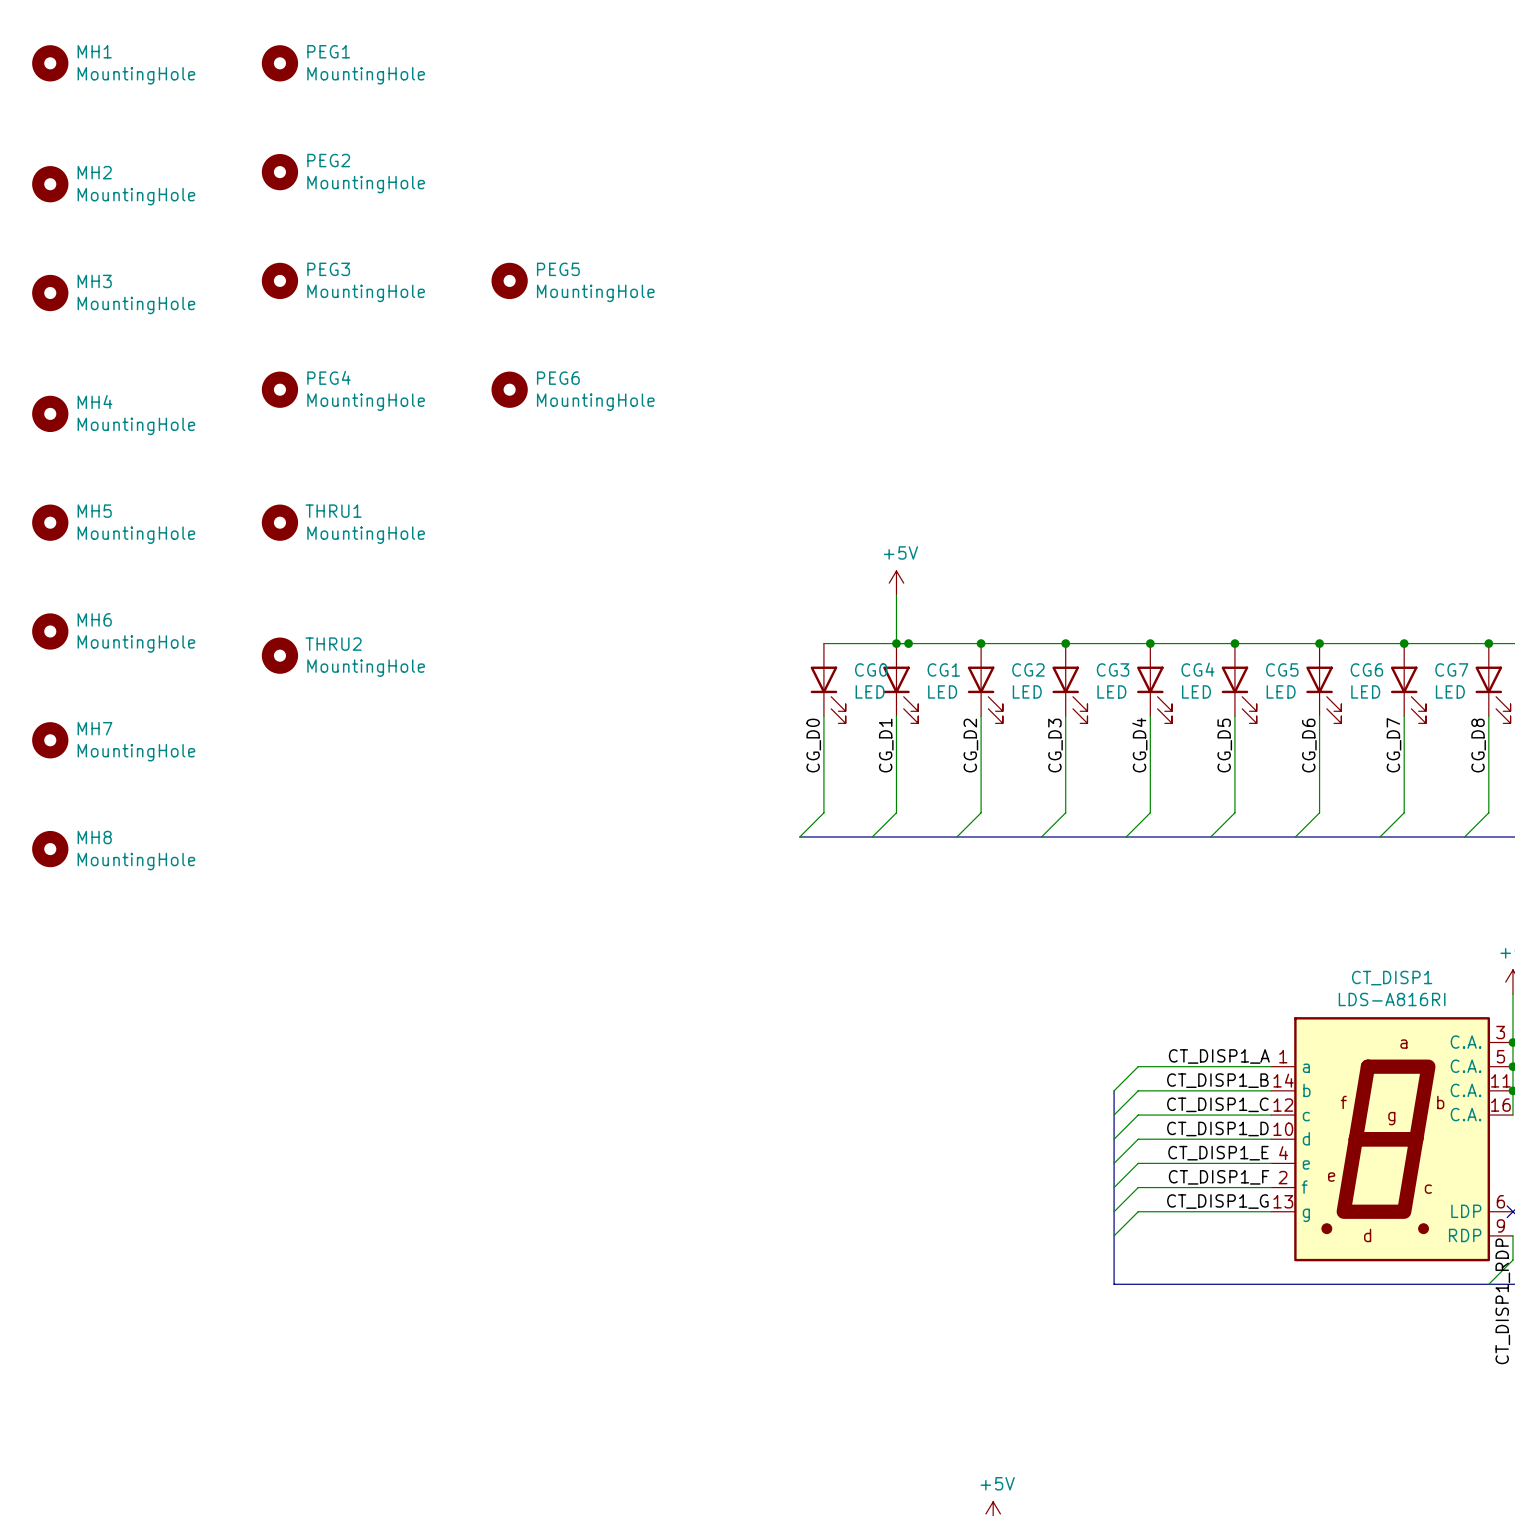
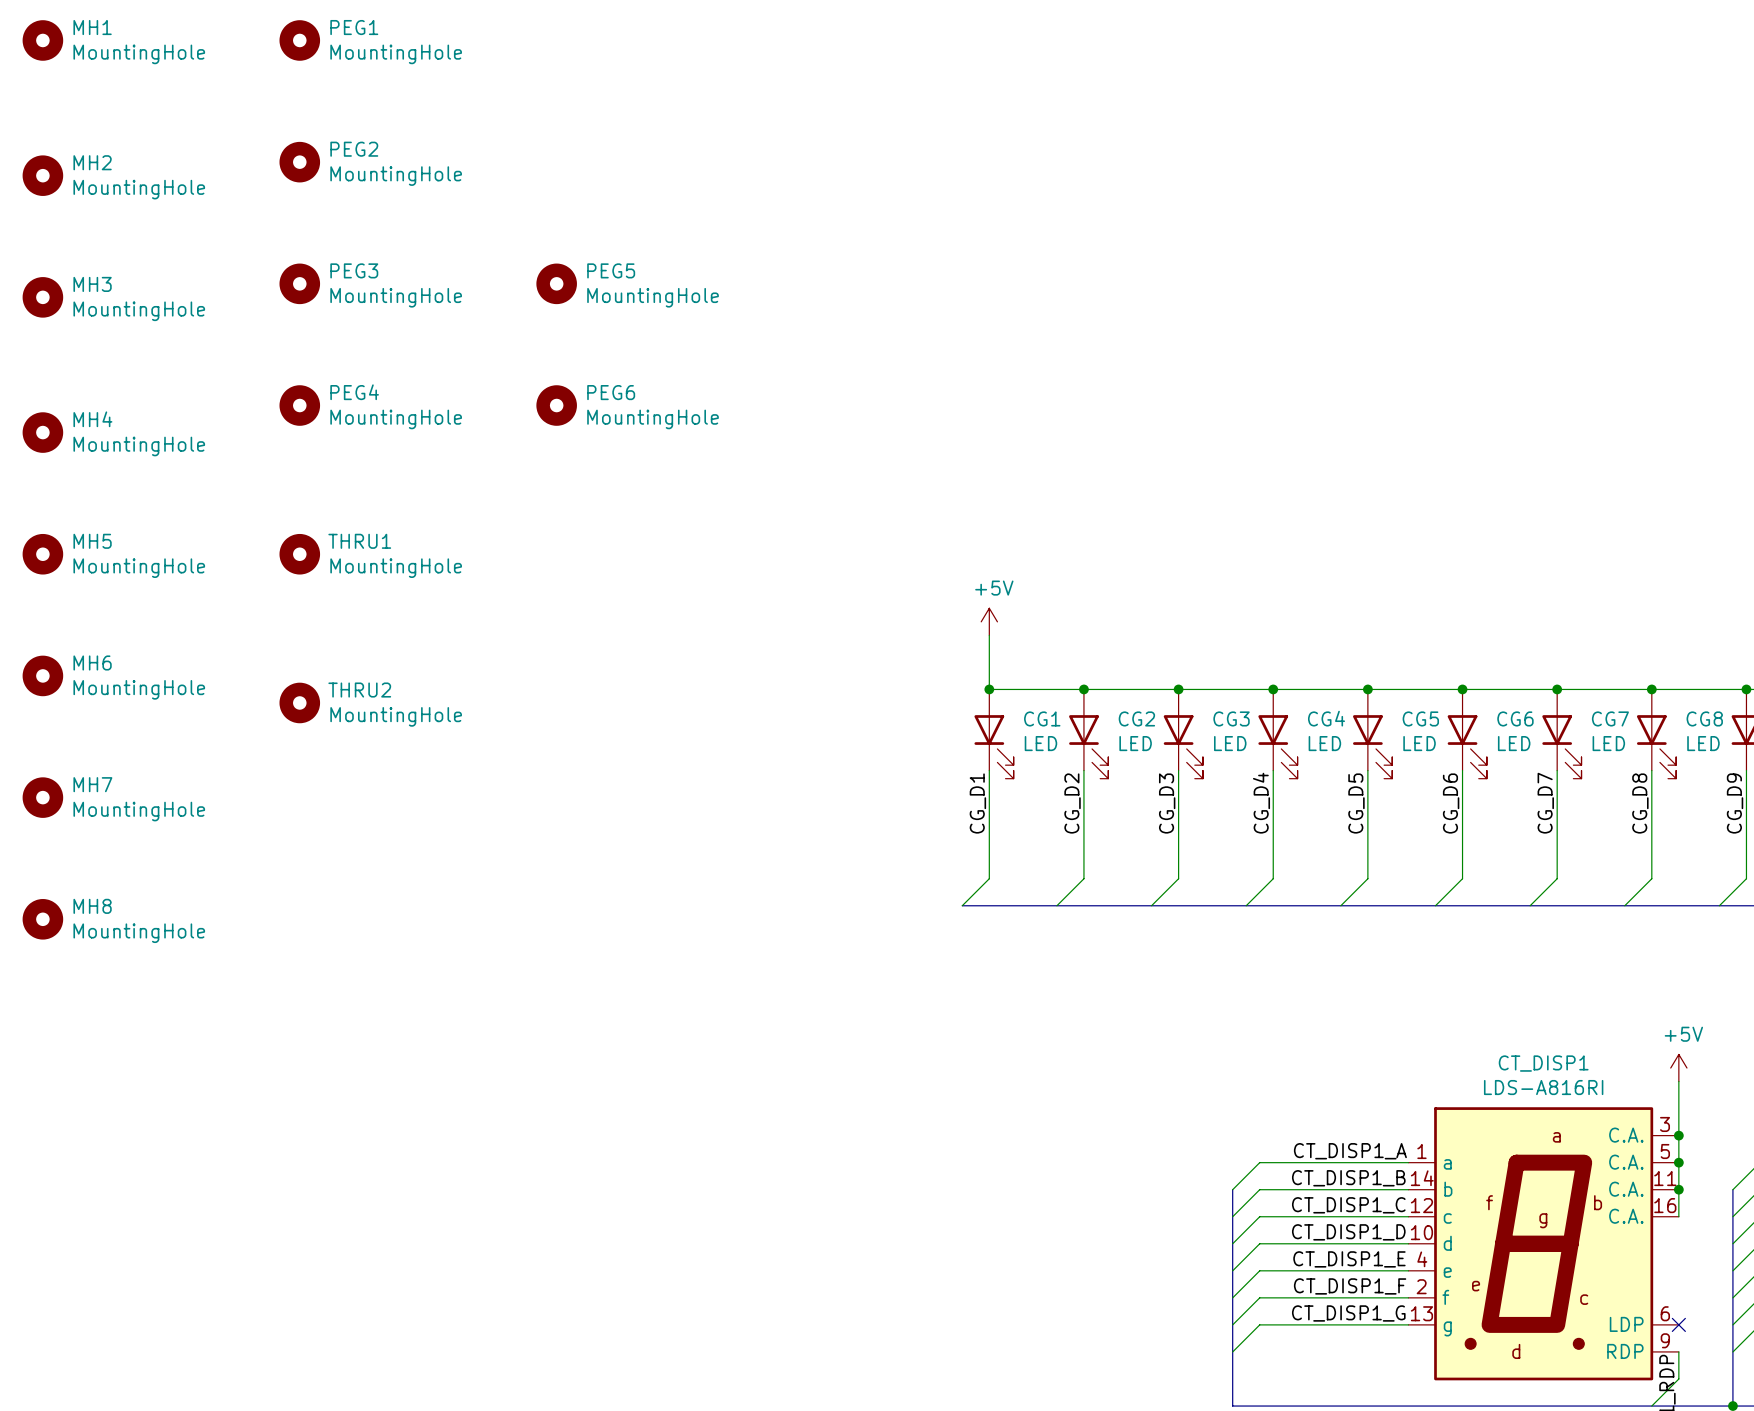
wire: (823, 643) (896, 643) -> none
junction: (908, 643) -> none
CG0: LED (828, 683) -> none
wire: (823, 716) (823, 812) (799, 836) -> none
label: CG_D0 (813, 745) -> none
bus: (799, 836) (872, 836) -> none

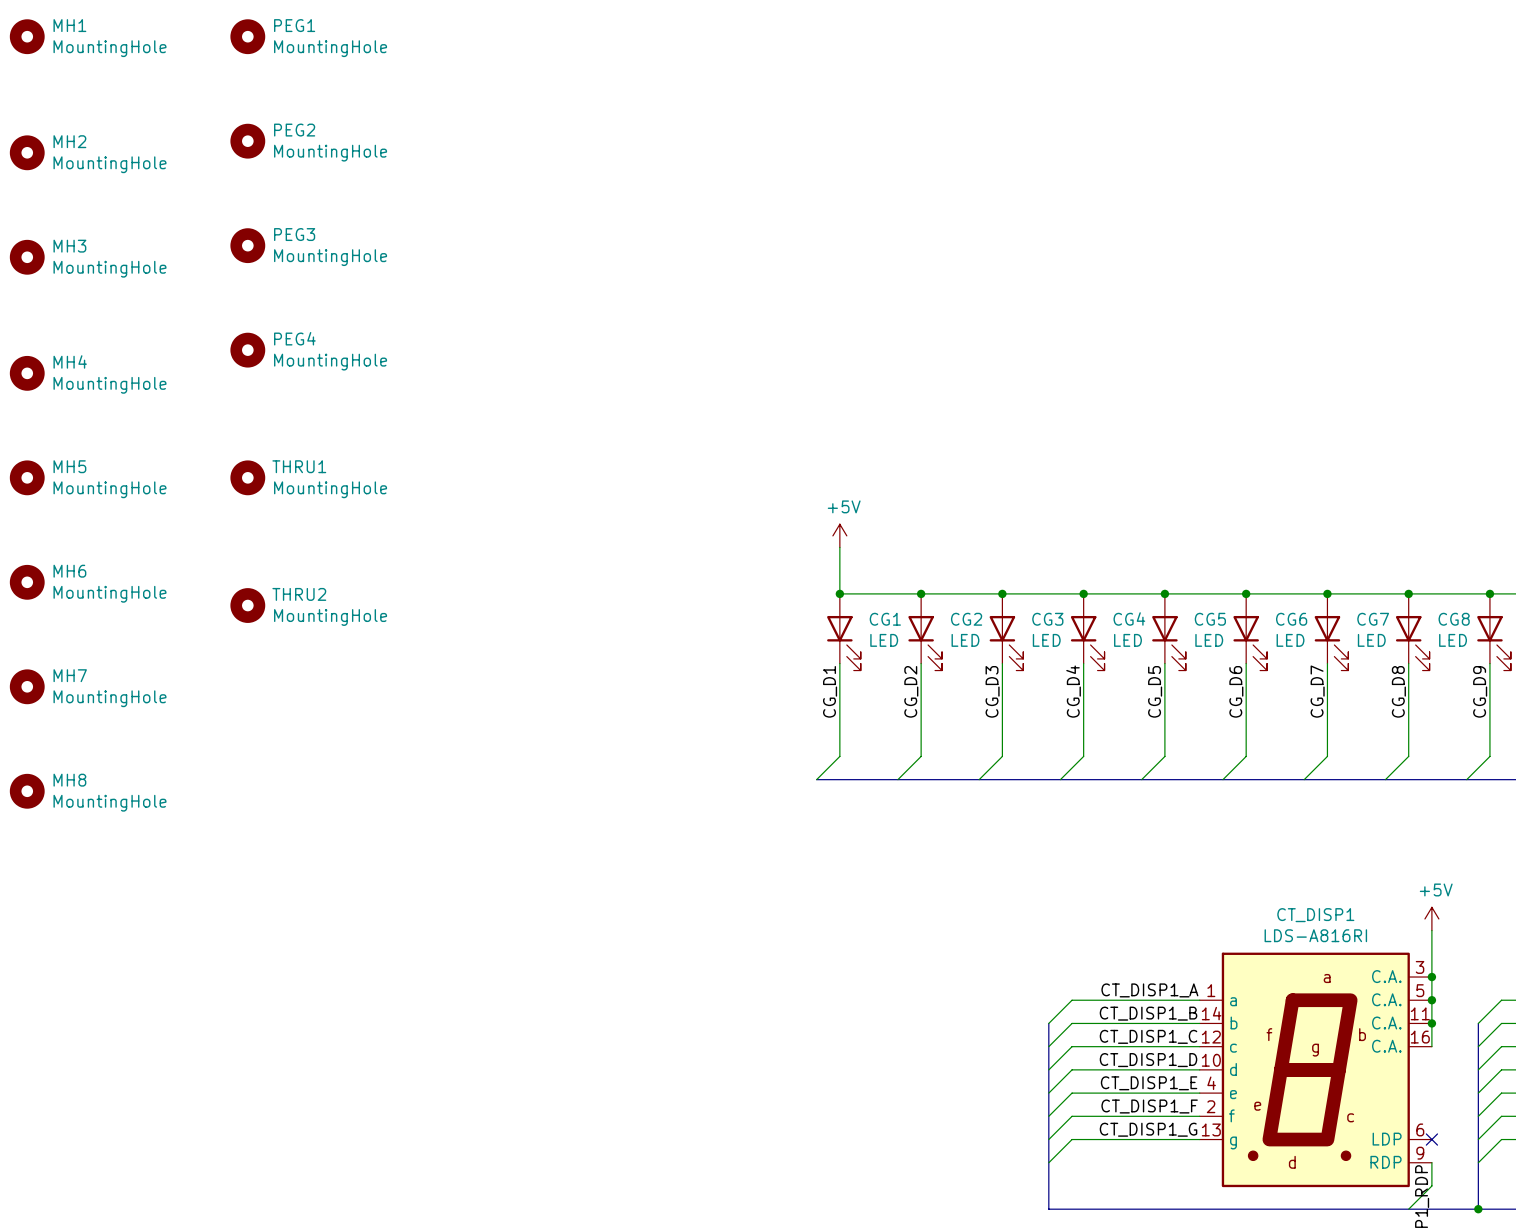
PEG5: MountingHole (556, 283) -> none
PEG6: MountingHole (556, 405) -> none

